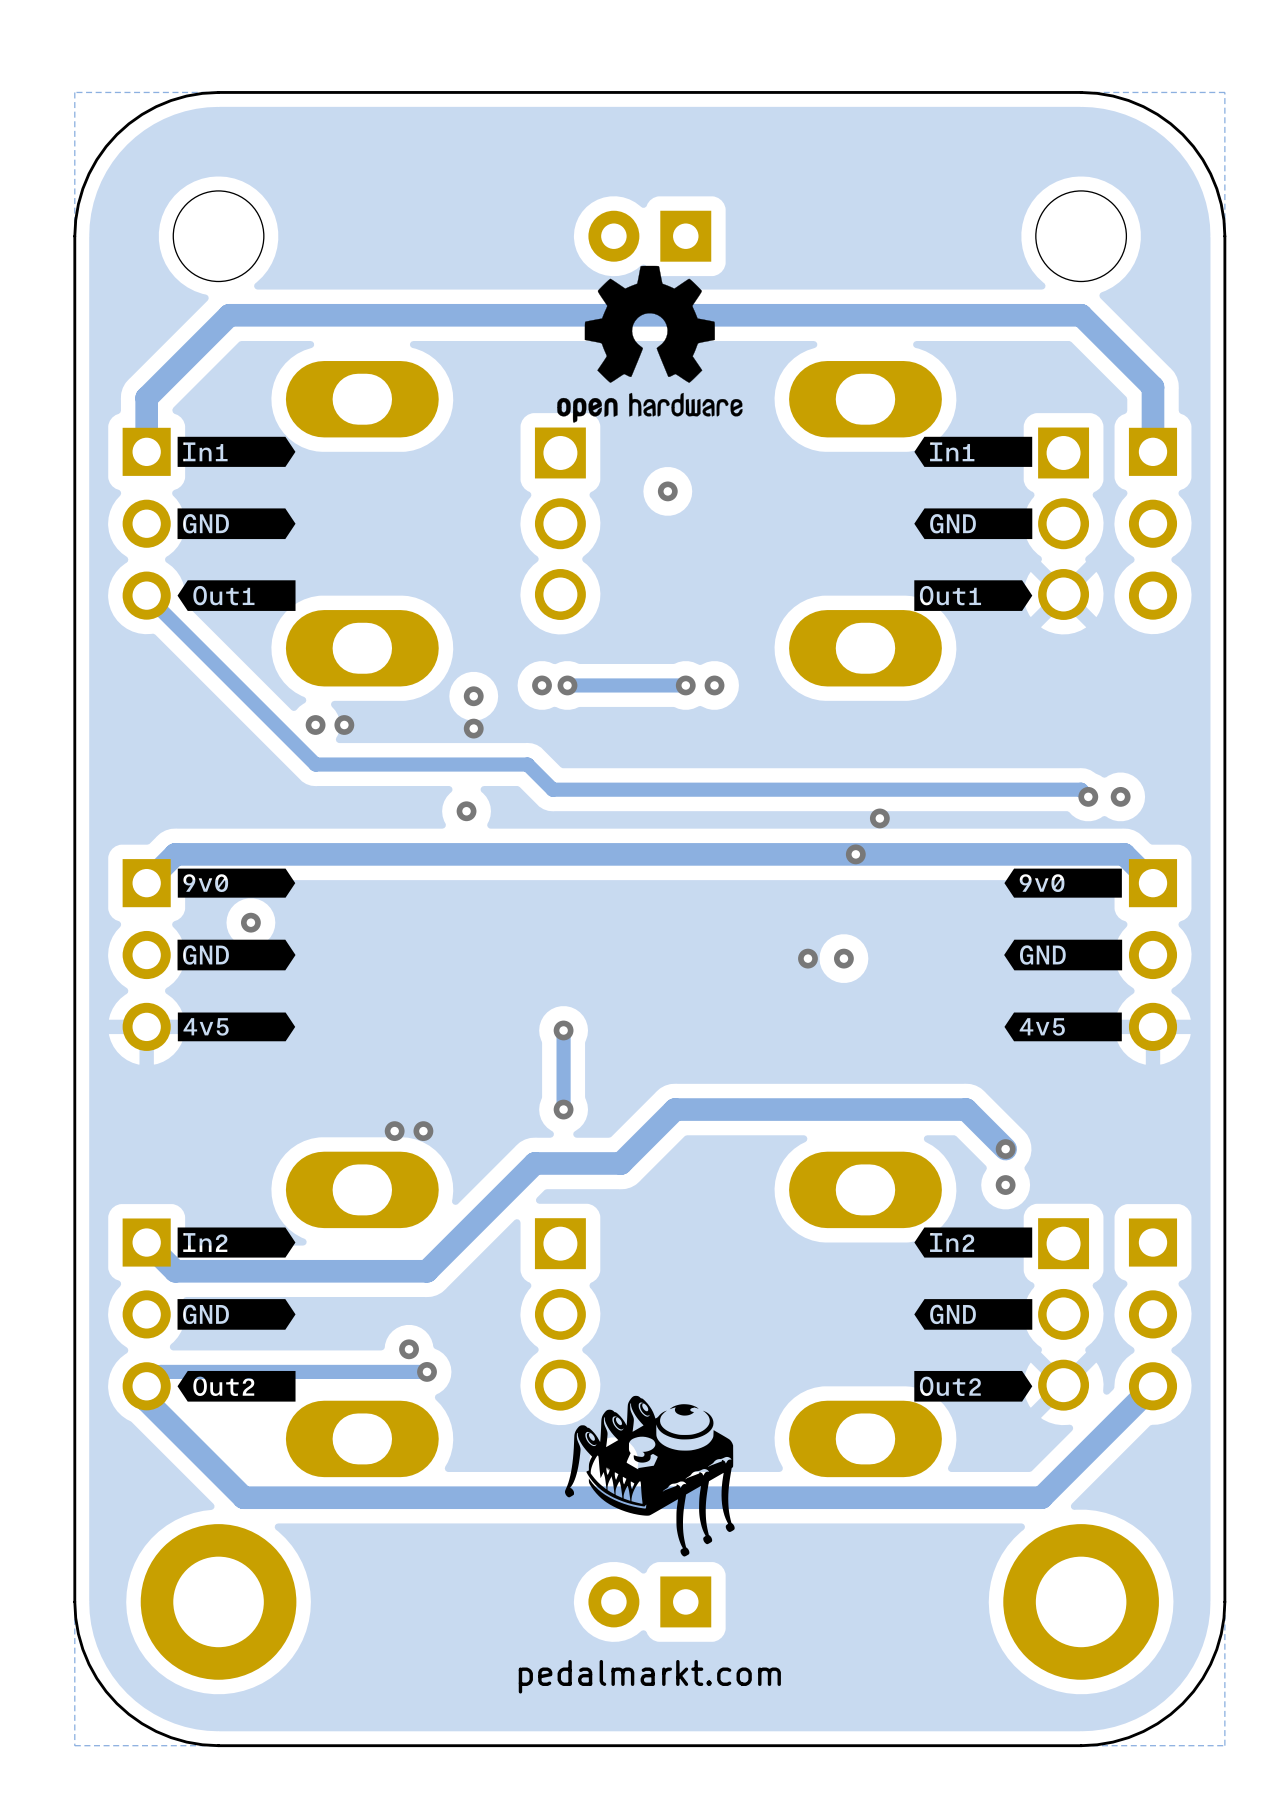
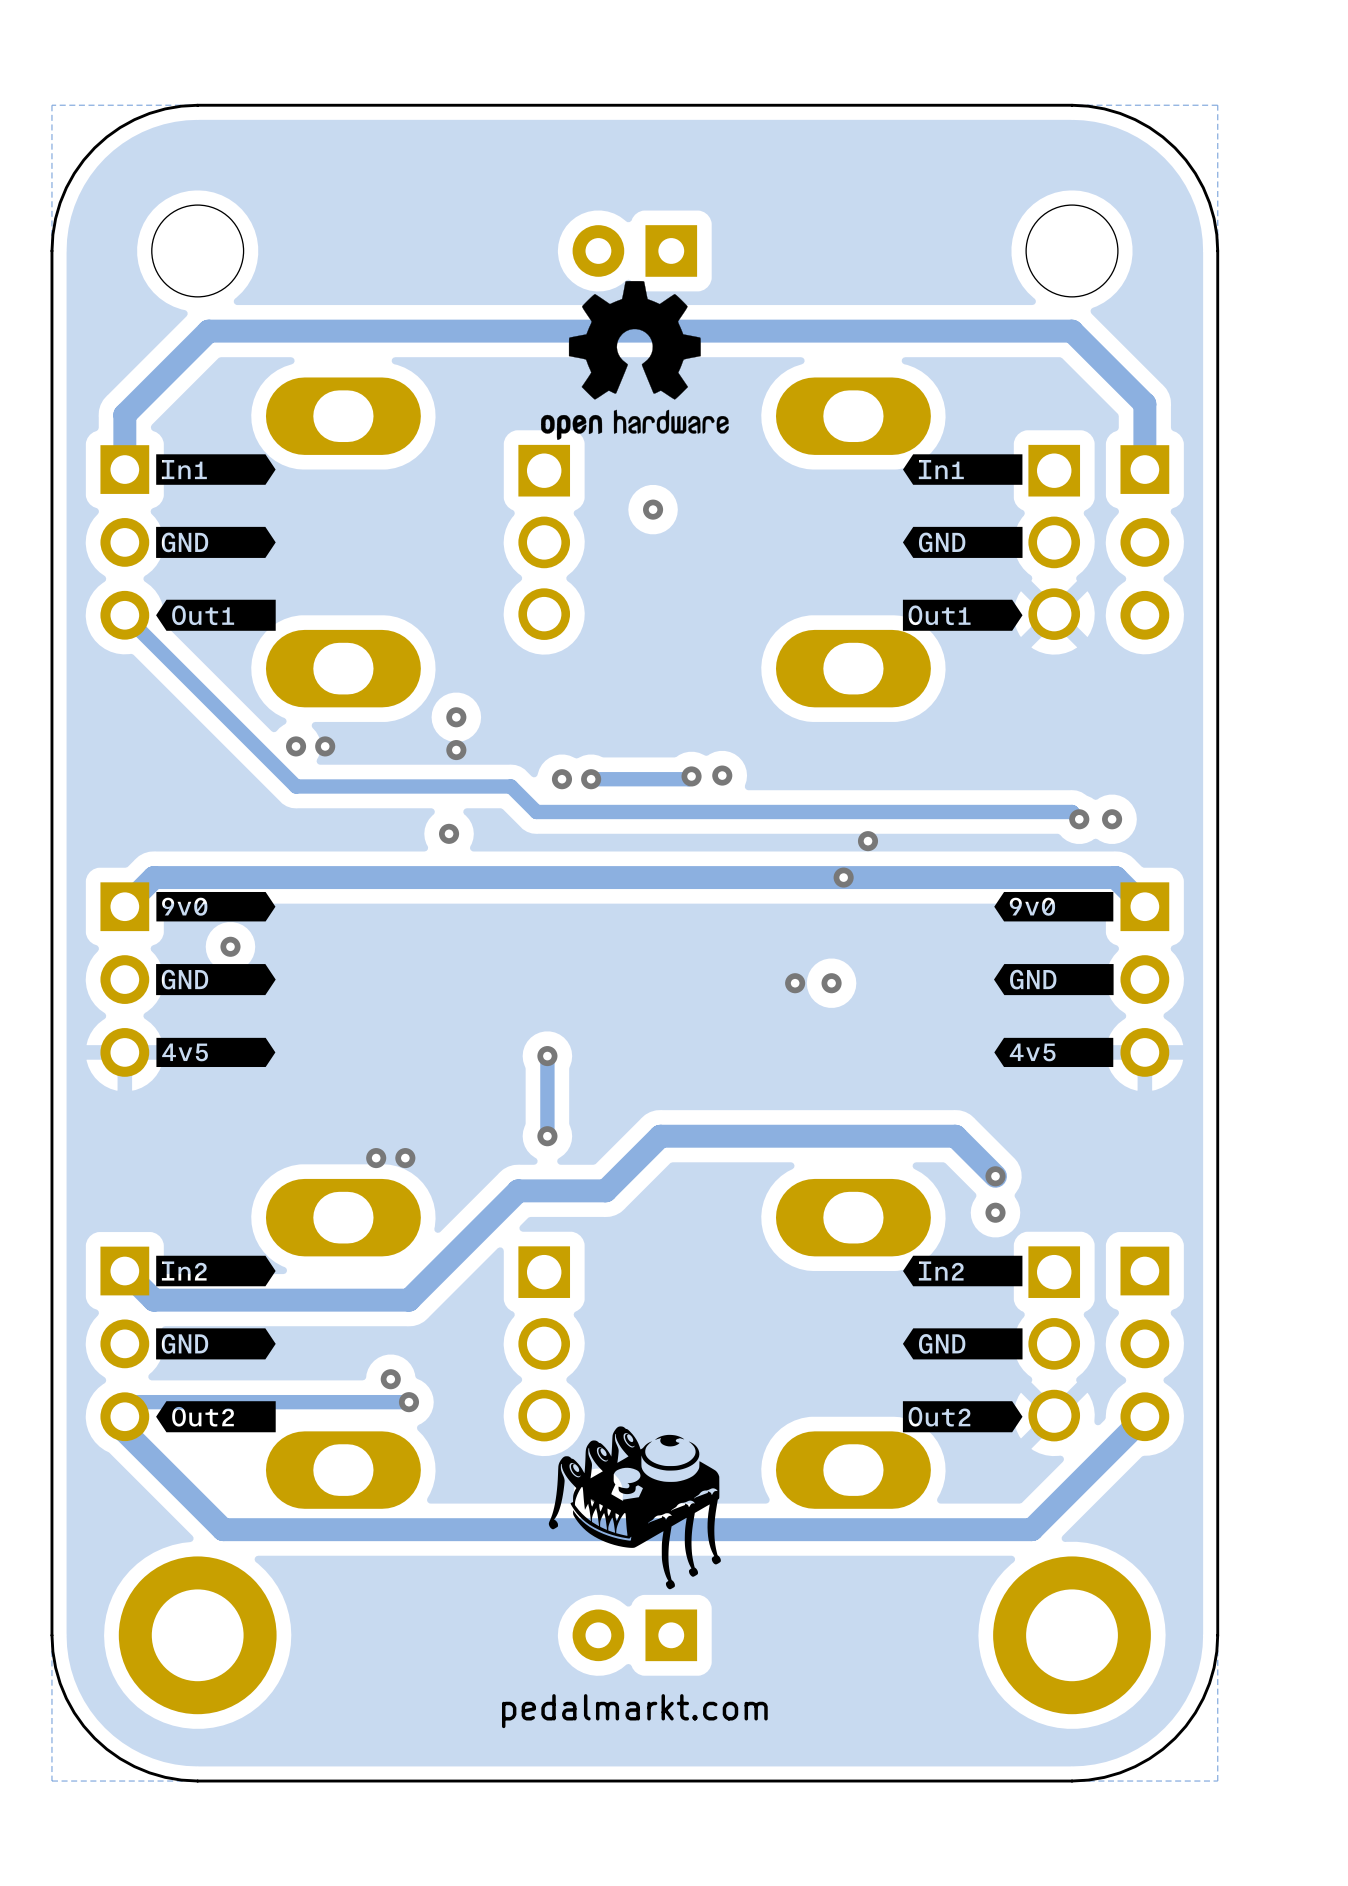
via: (542, 685) -> none
via: (567, 685) -> none
track: (685, 685) (567, 685) -> none
via: (685, 685) -> none
via: (714, 685) -> none
via: none -> (722, 775)
track: none -> (691, 776) (688, 779) (591, 779)
via: none -> (691, 776)
via: none -> (561, 779)
via: none -> (591, 779)

